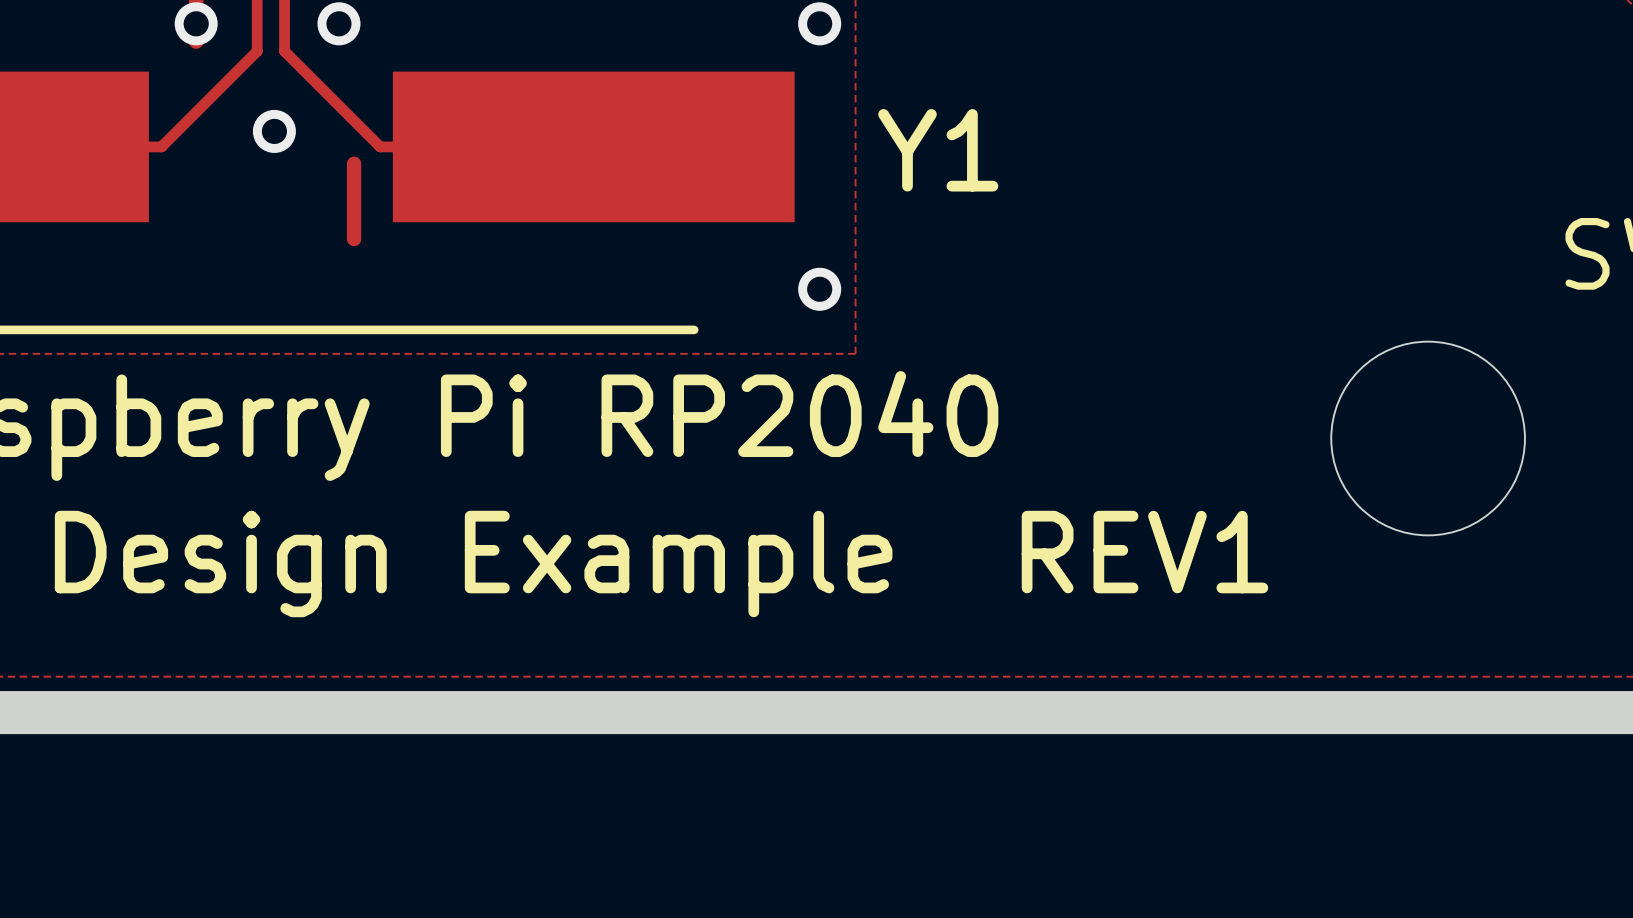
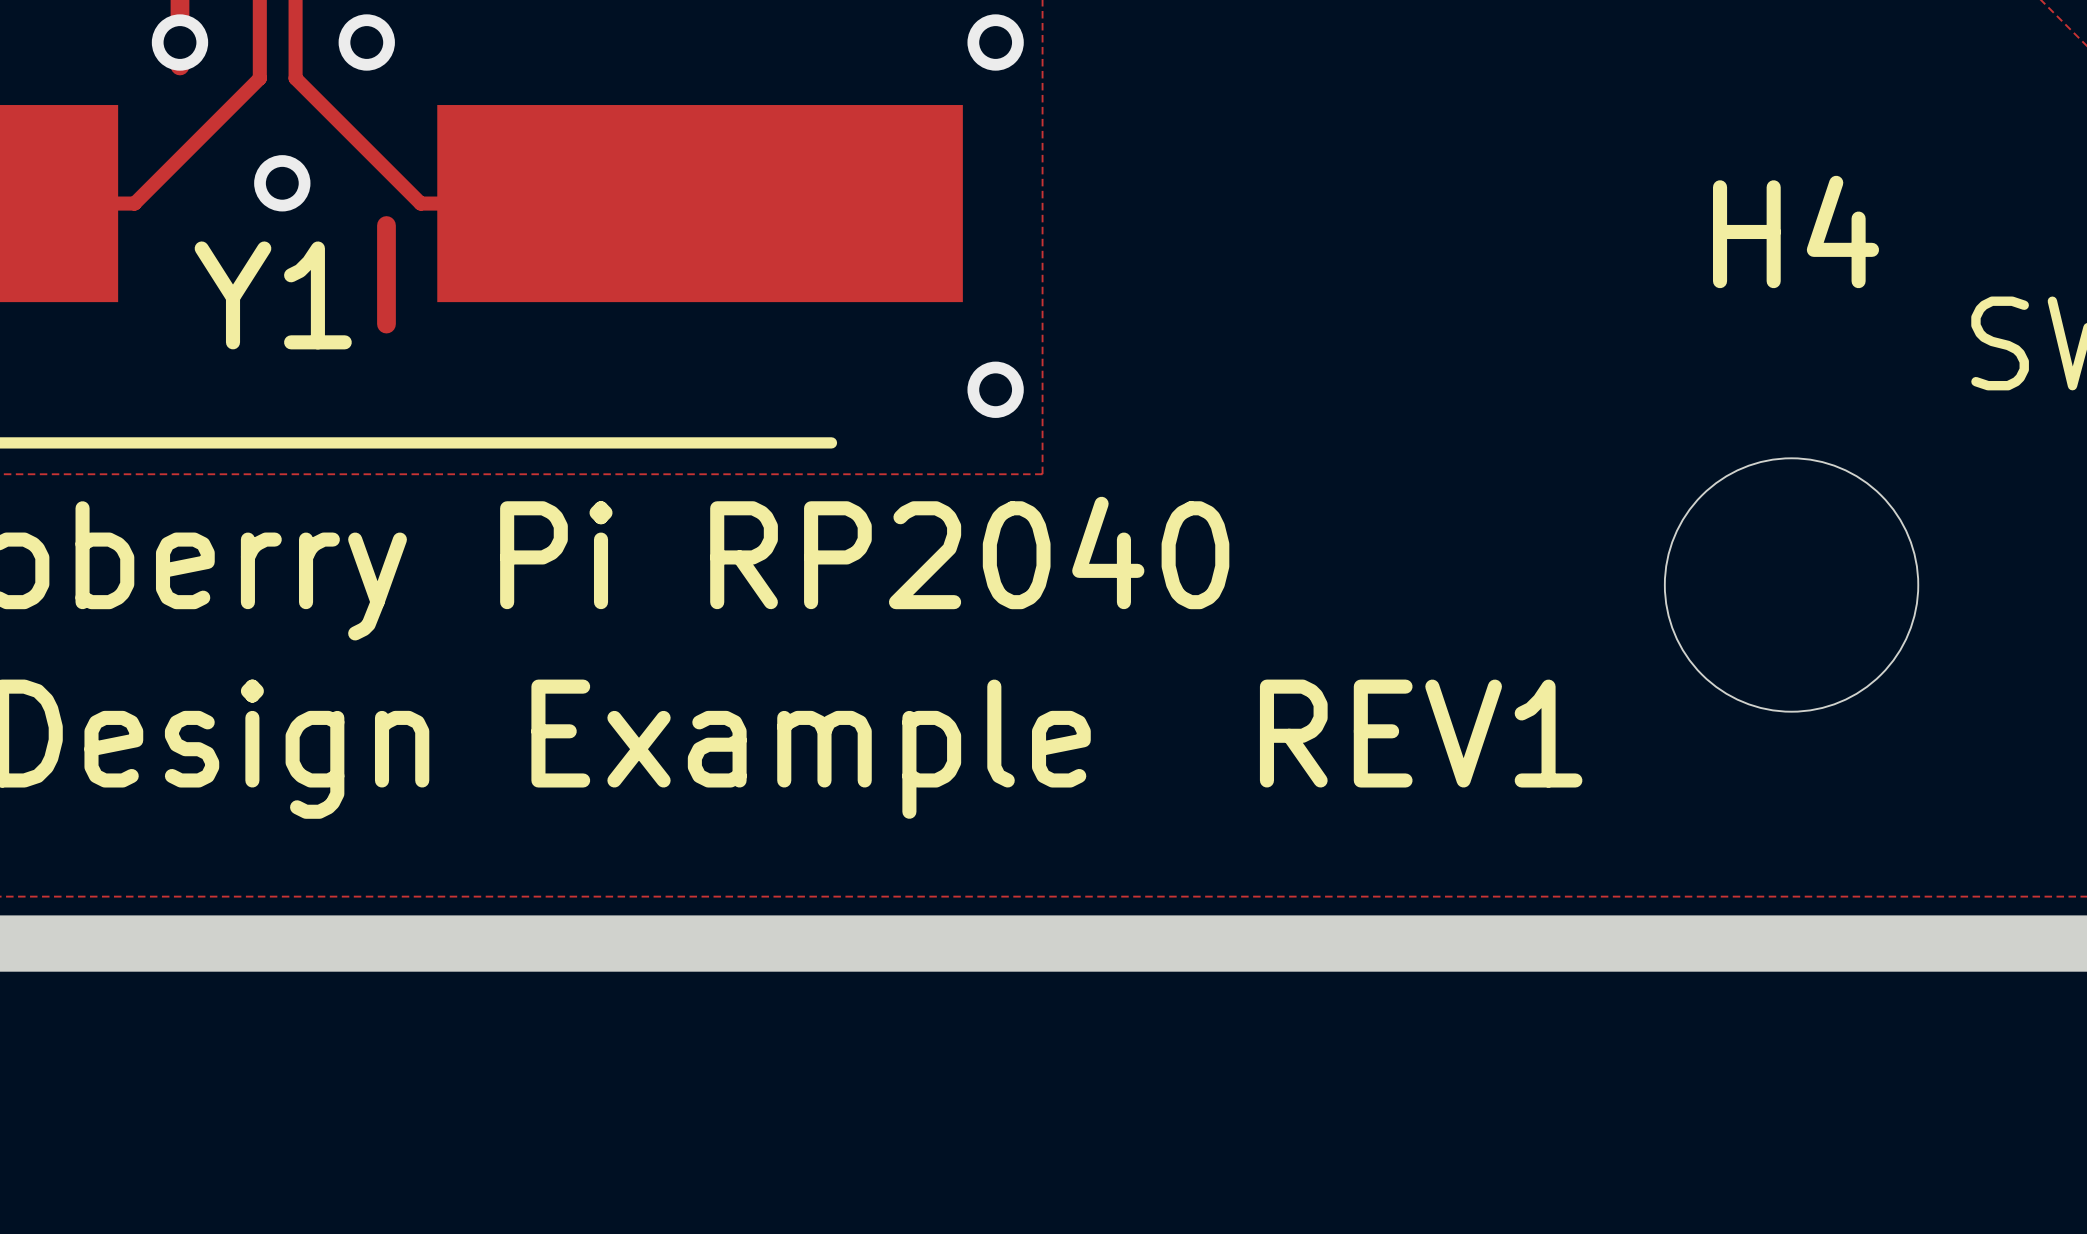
Y1 name position: Y1 (938, 150) -> Y1 (273, 295)
H4 name: none -> H4 (1796, 231)

